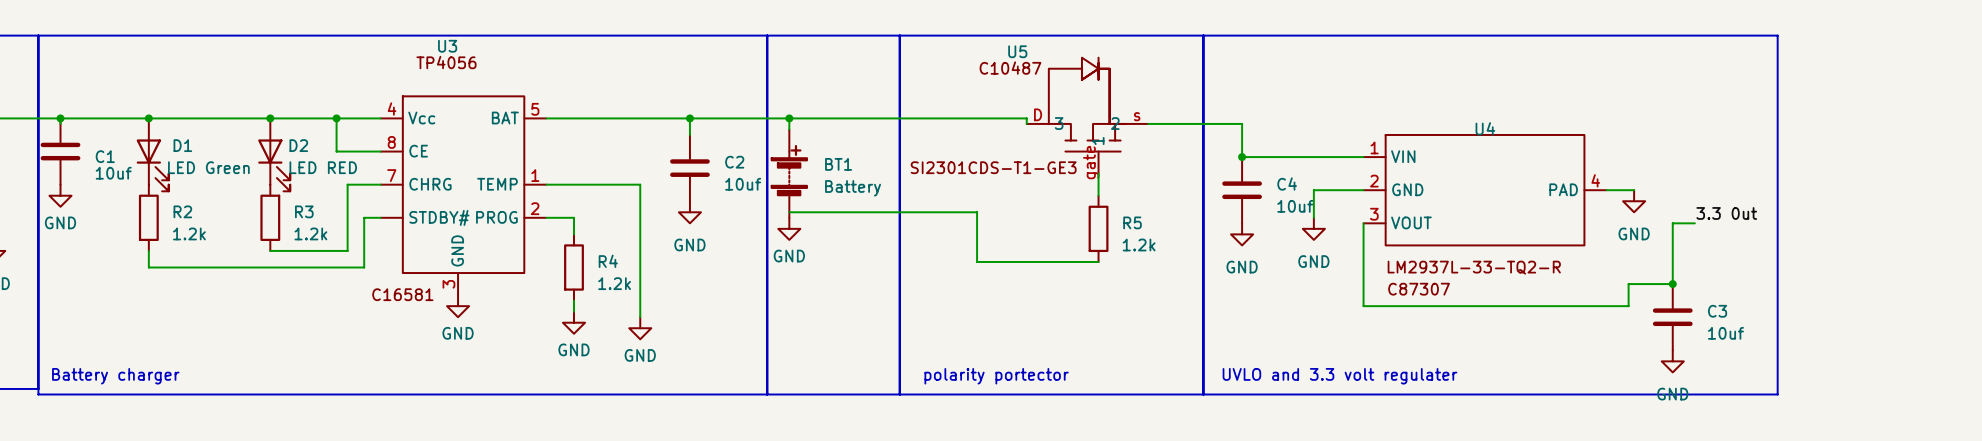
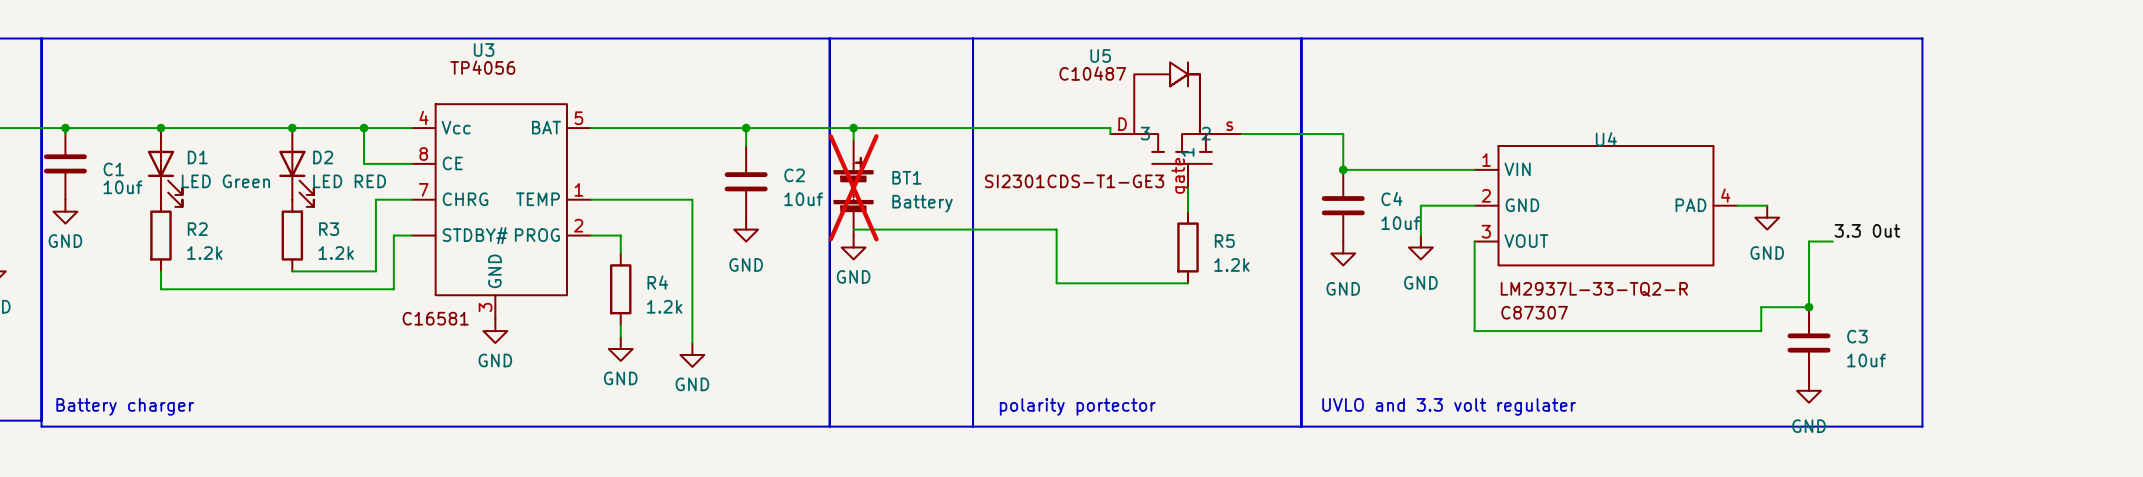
BT1 do-not-place cross: none -> (853, 187)

